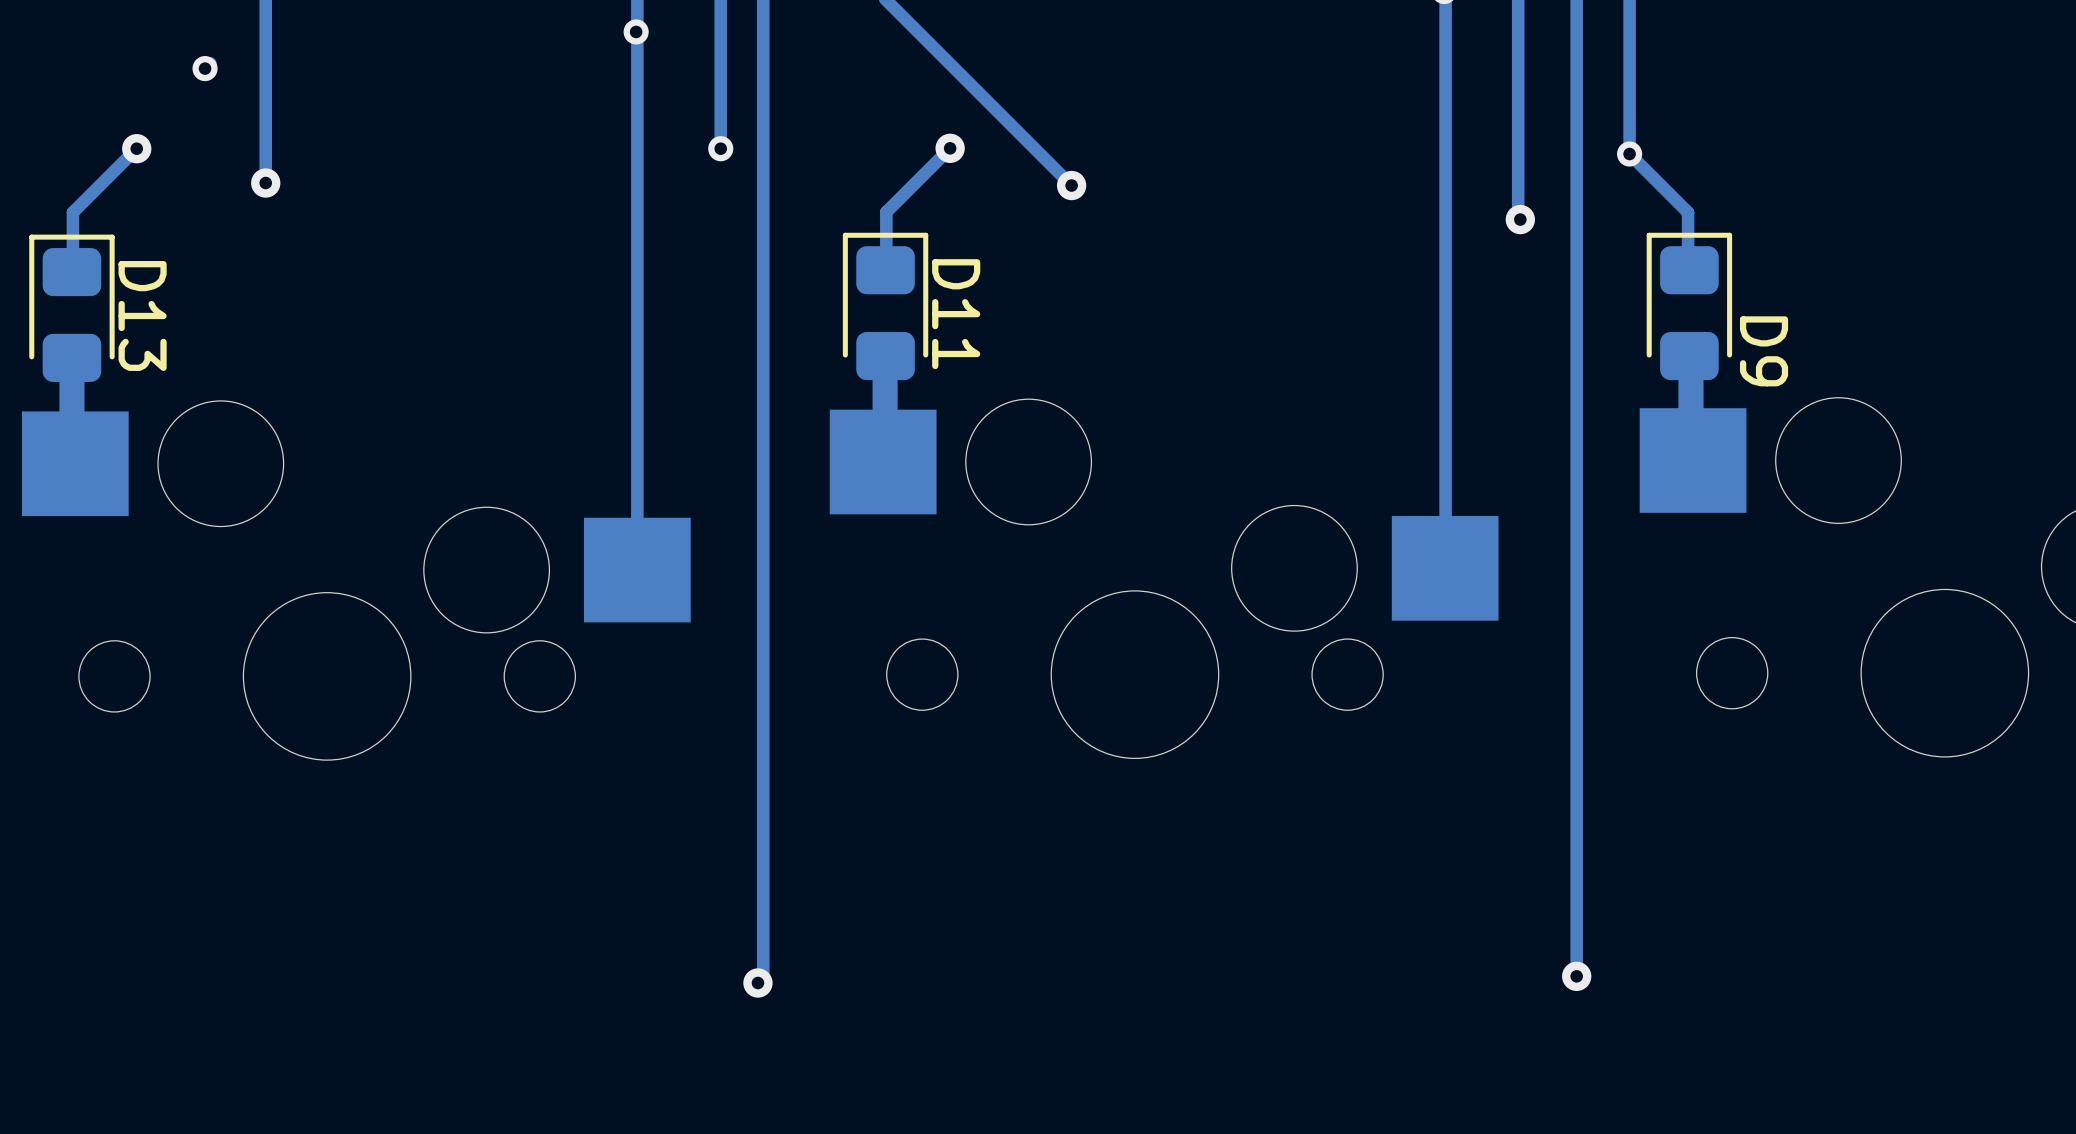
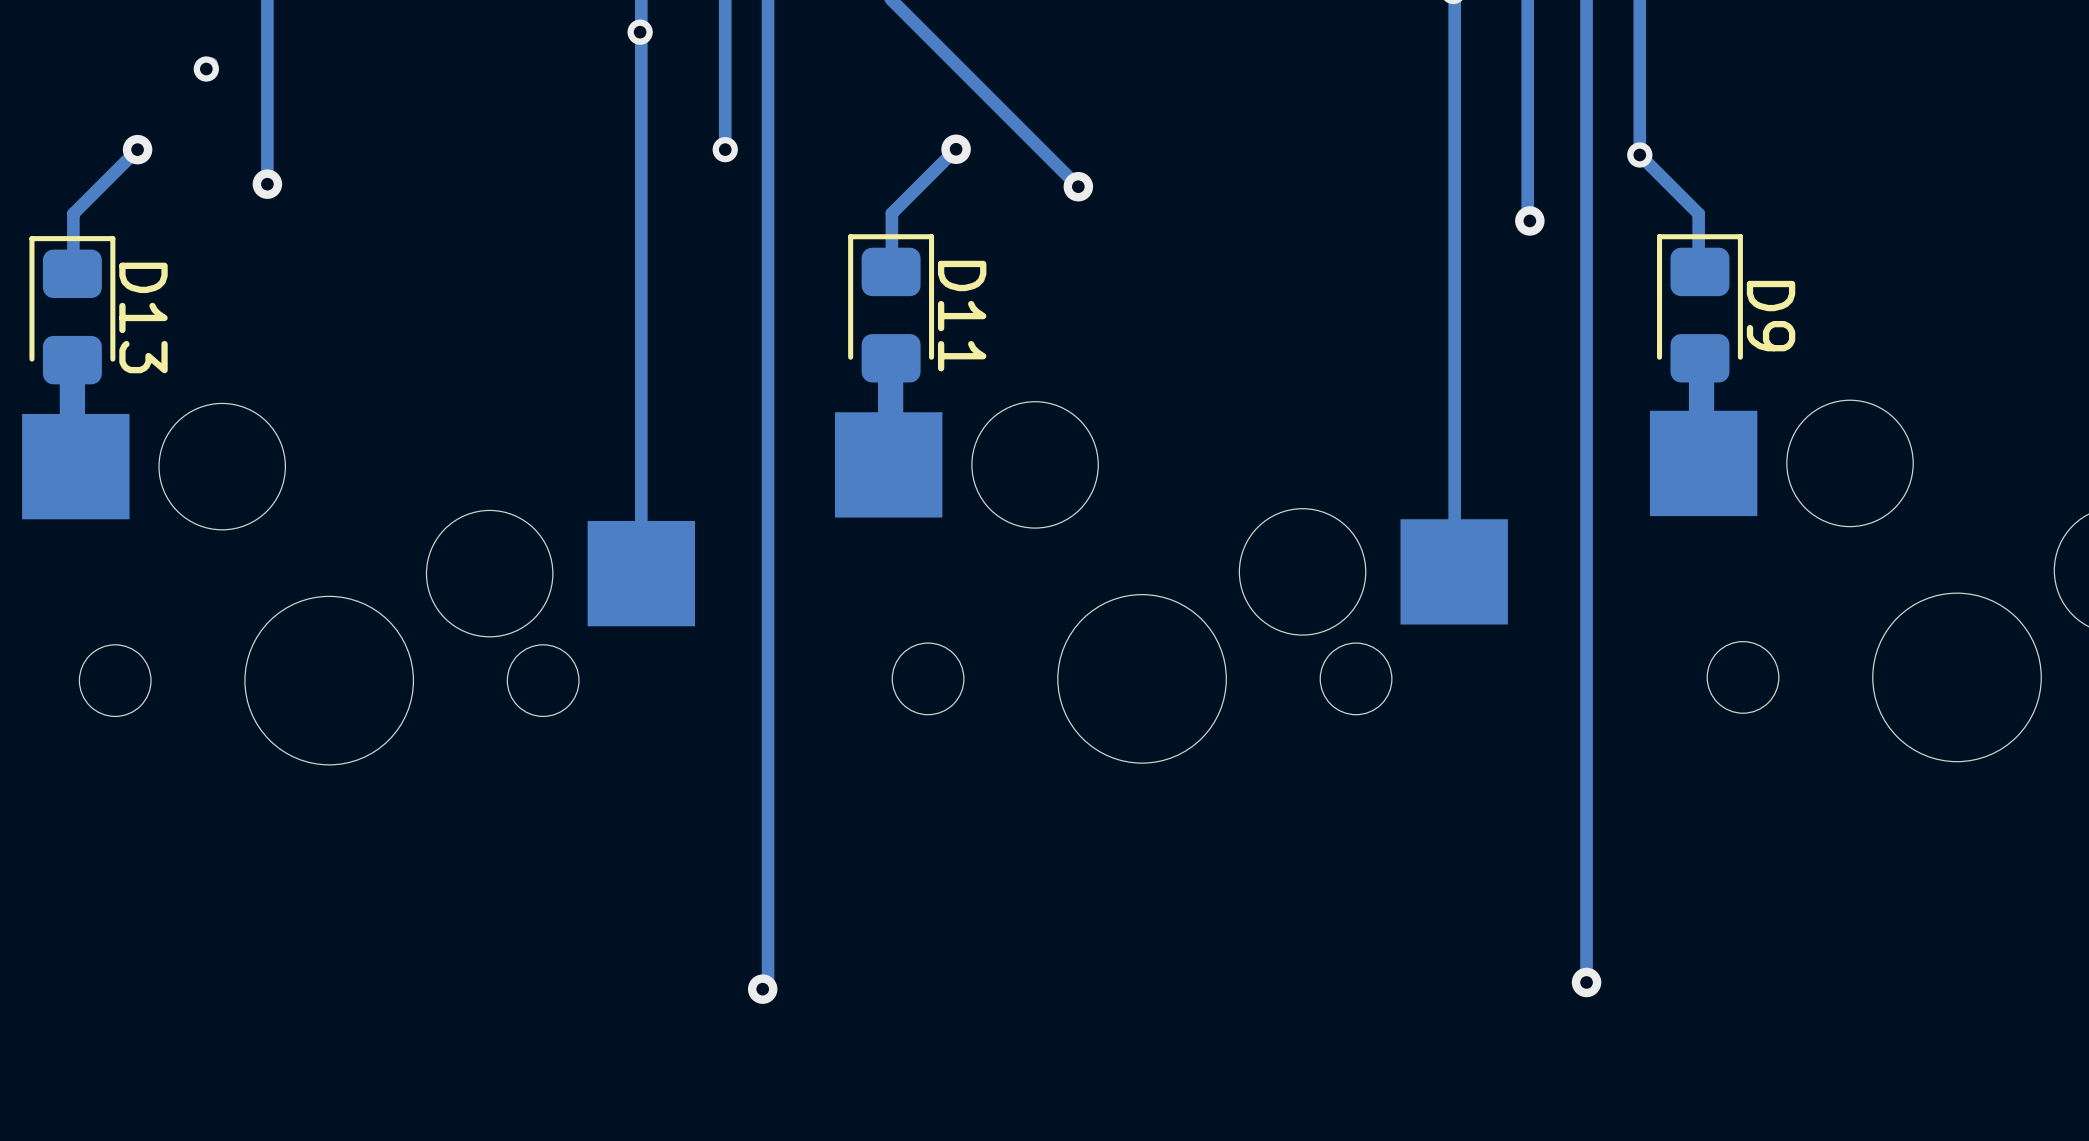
D9 name position: D9 (1764, 351) -> D9 (1771, 316)

